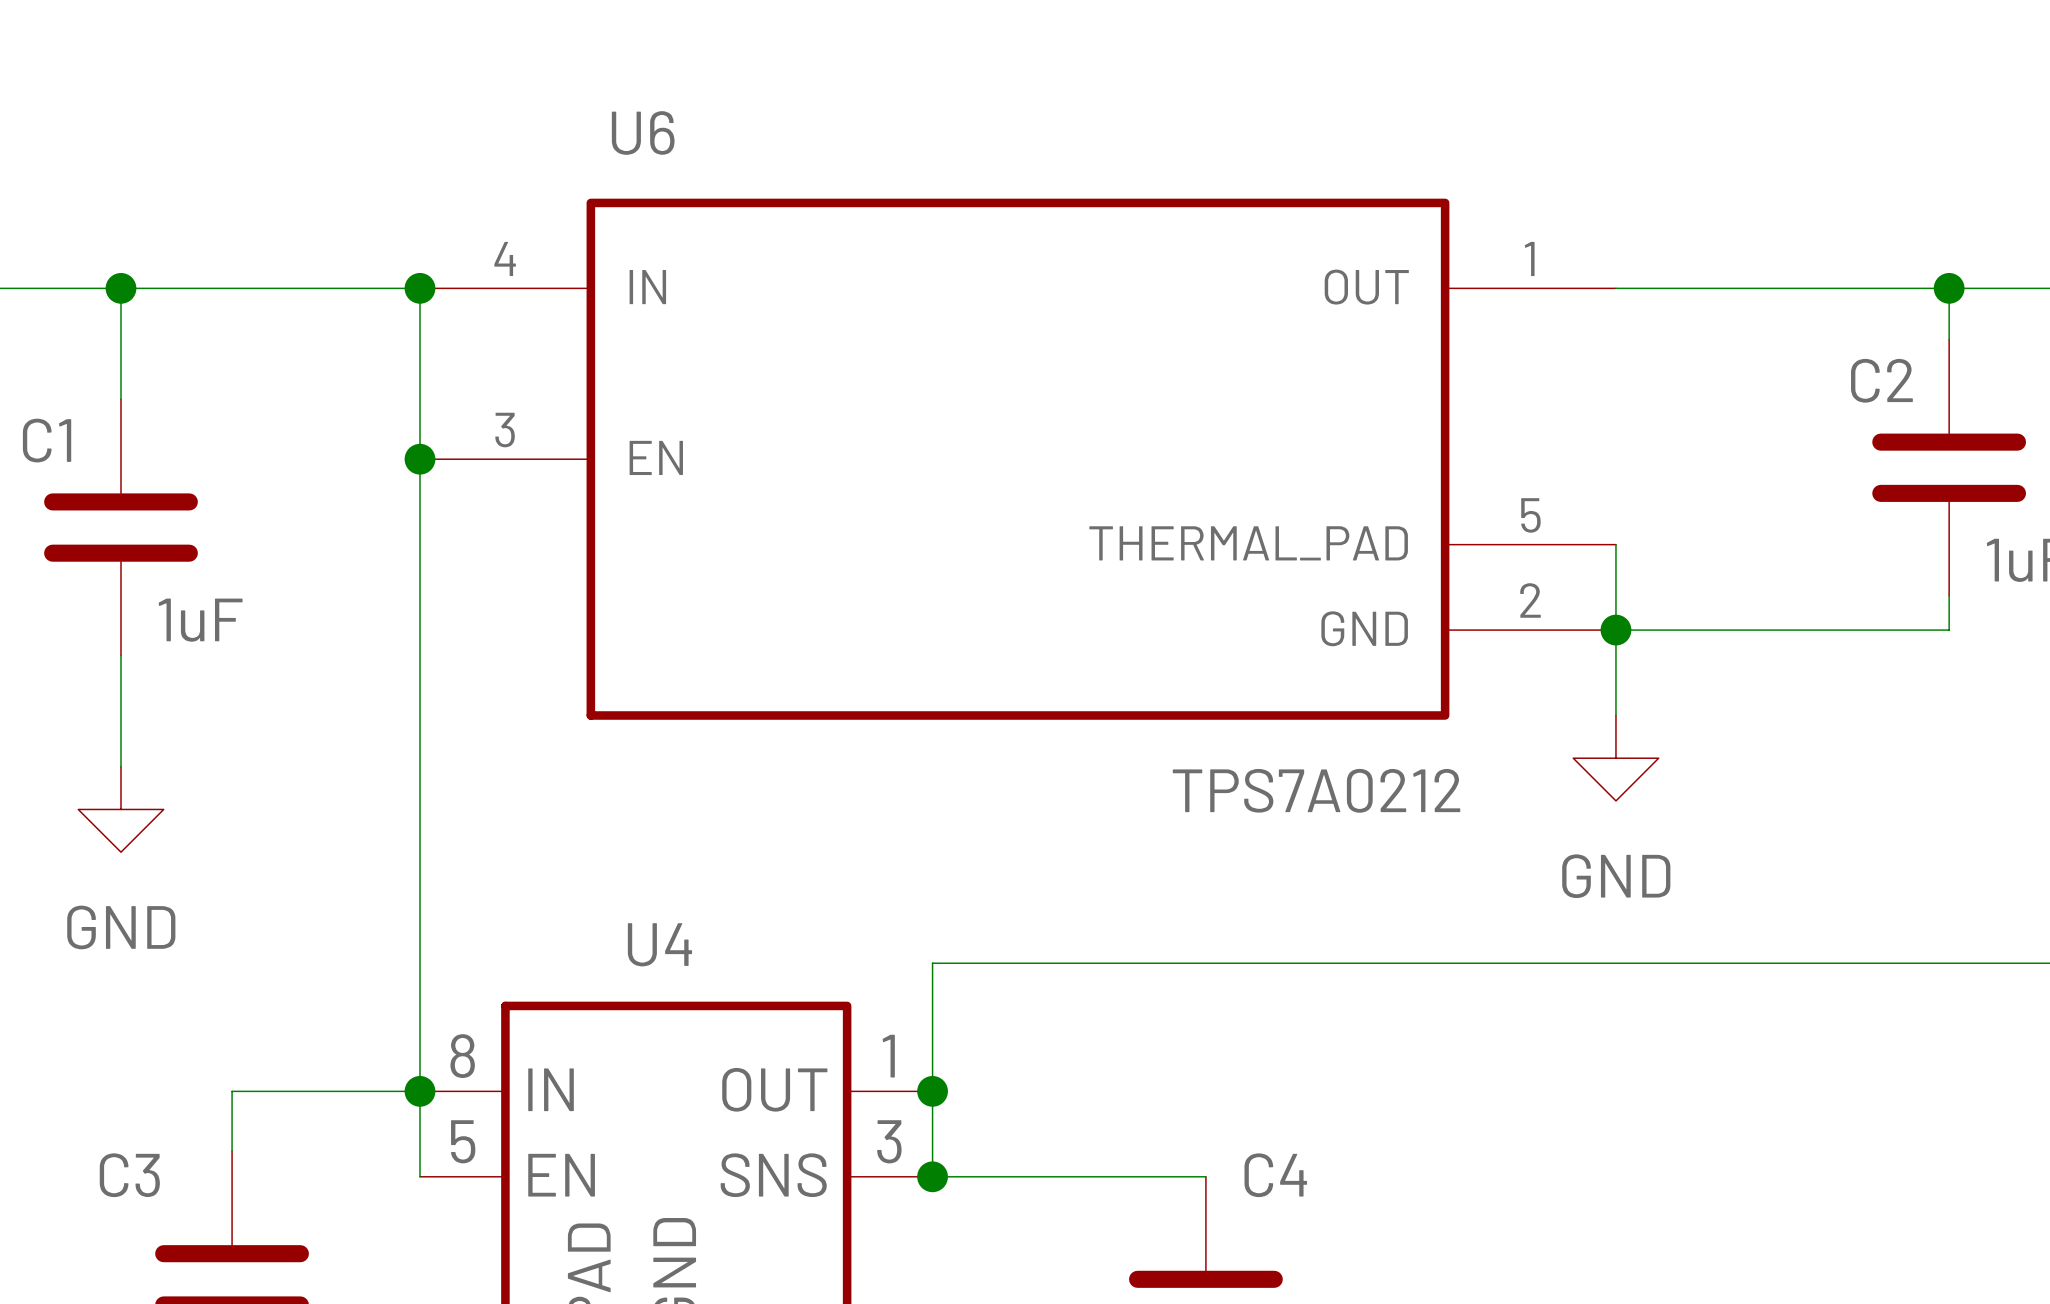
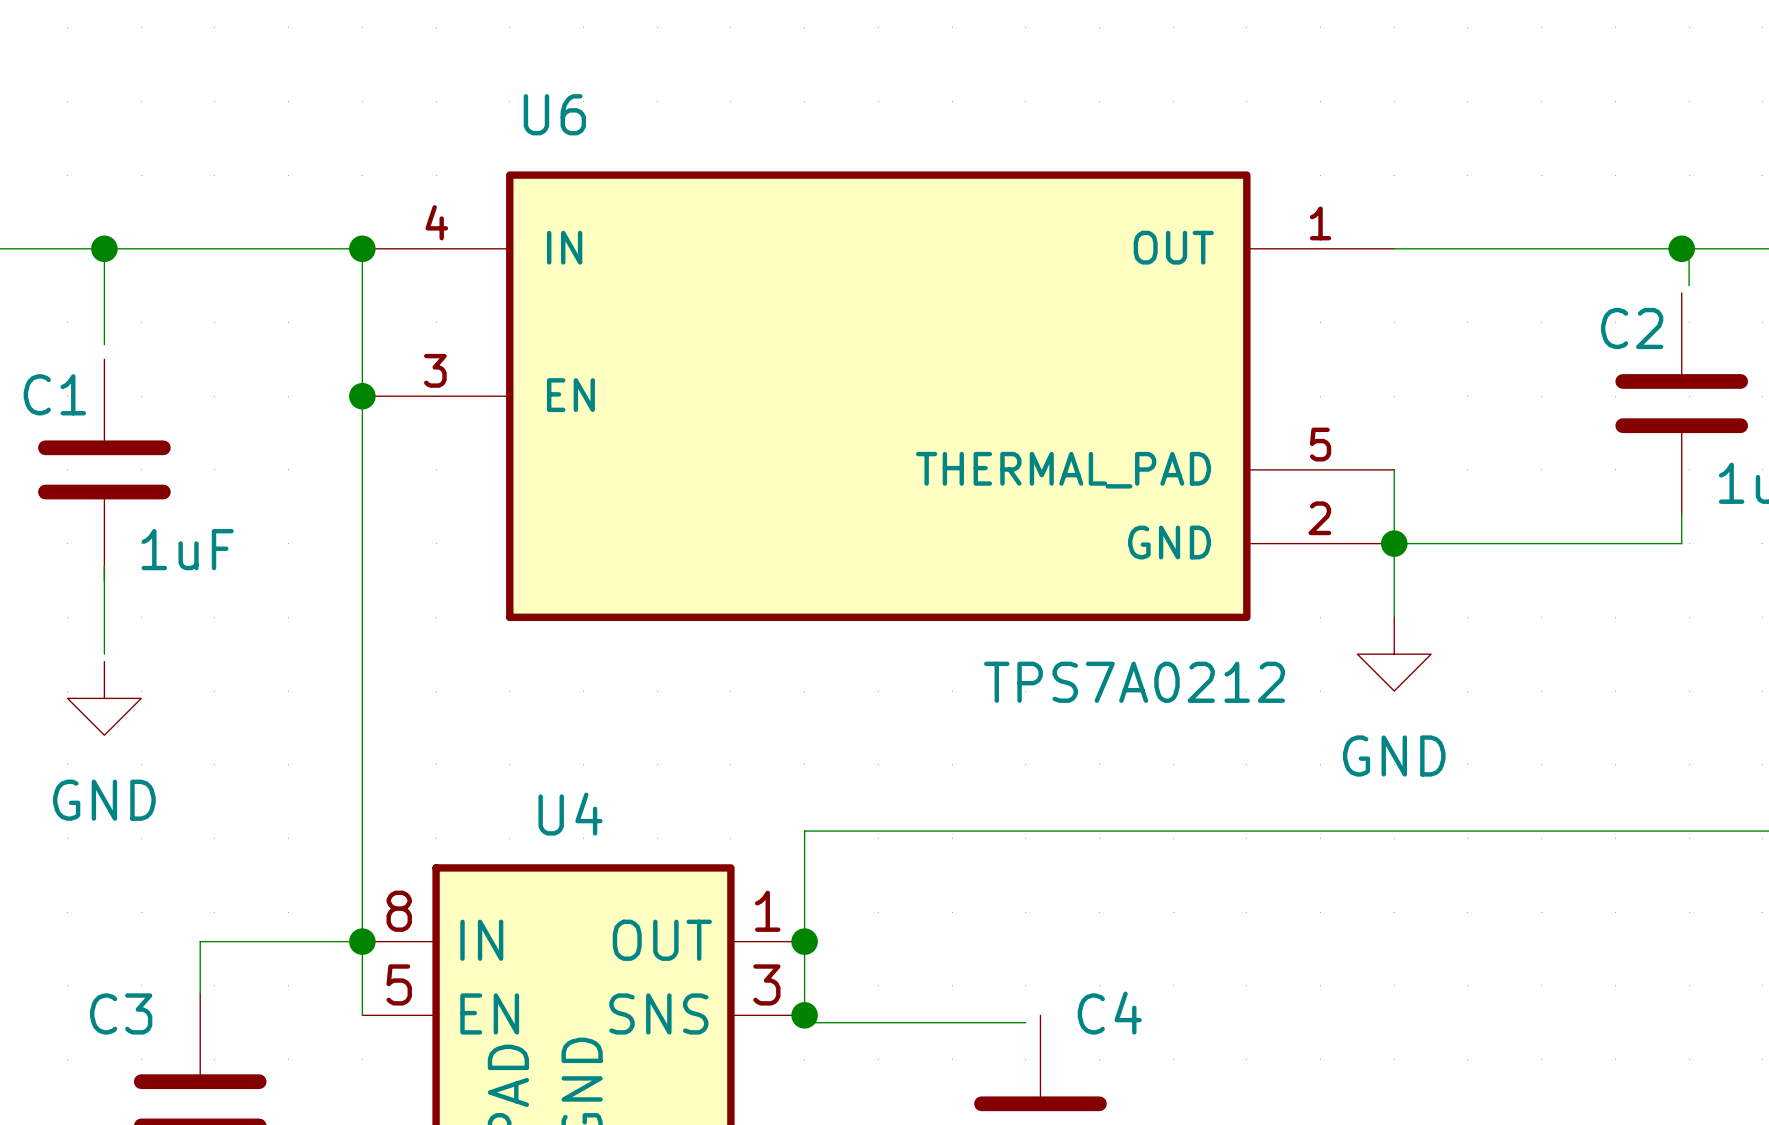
wire: (1949, 288) (1949, 339) -> none
wire: none -> (1689, 248) (1689, 285)
C1 position: (121, 527) -> (104, 469)
wire: (121, 758) (121, 766) -> none
wire: (932, 1176) (1205, 1176) -> (804, 1015) (804, 1022) (1025, 1022)

